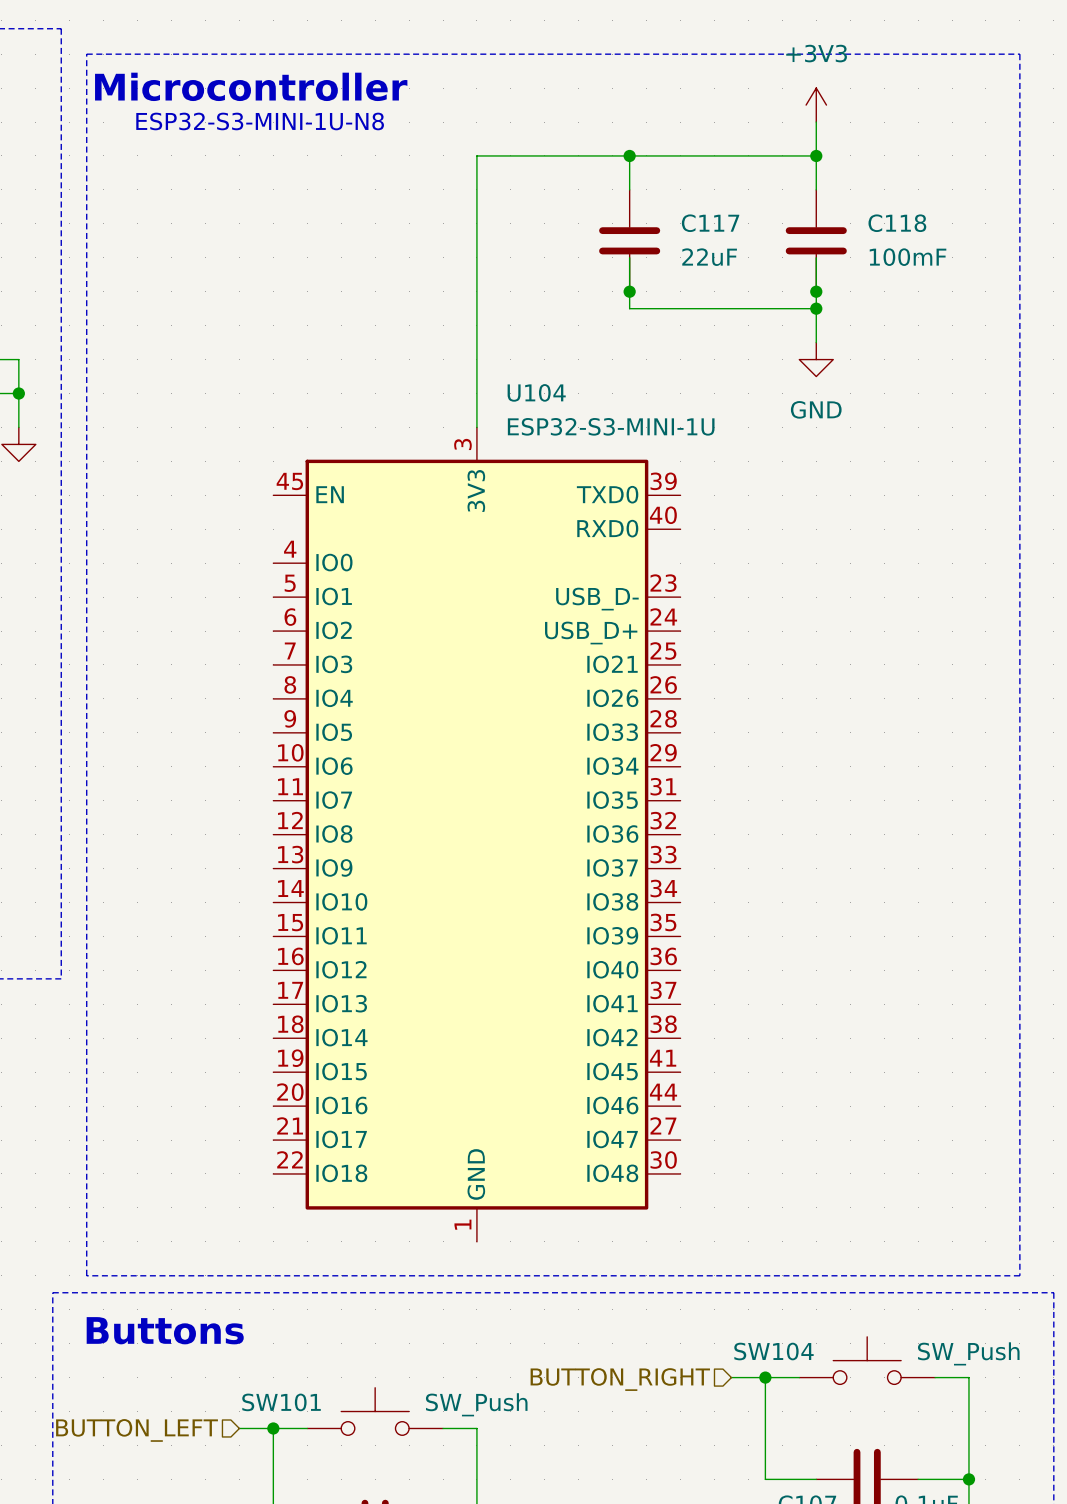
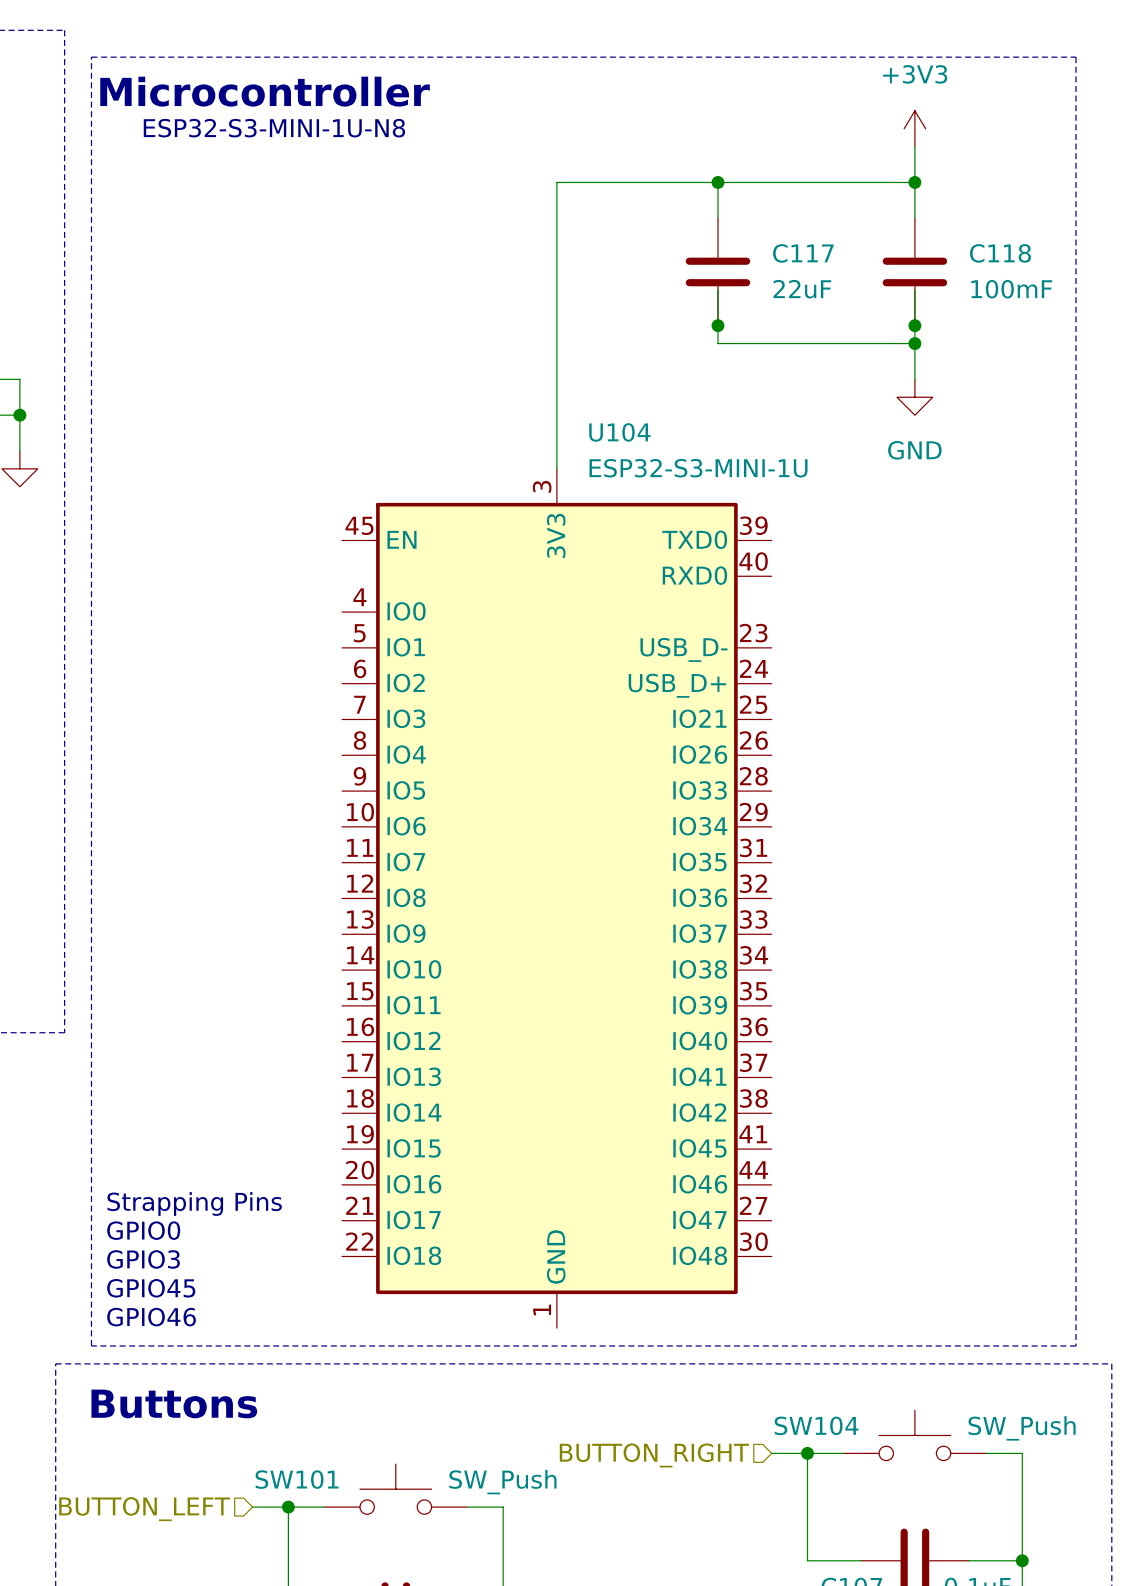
power symbol position: +3V3 (816, 105) -> +3V3 (914, 128)
wire: (816, 122) (816, 189) -> (914, 146) (914, 218)
wire: (629, 155) (629, 189) -> (717, 182) (717, 218)
junction position: (629, 155) -> (717, 182)
wire: (816, 155) (476, 155) (476, 427) -> (914, 182) (556, 182) (556, 468)
junction position: (816, 155) -> (914, 182)
C117 position: (629, 240) -> (717, 271)
C118 position: (816, 240) -> (914, 271)
wire: (629, 257) (629, 308) (816, 308) -> (717, 289) (717, 343) (914, 343)
wire: (816, 257) (816, 342) -> (914, 289) (914, 379)
junction position: (629, 291) -> (717, 325)
junction: (816, 291) -> none
junction: (816, 308) -> none
junction: none -> (914, 325)
junction: none -> (914, 343)
power symbol position: GND (816, 359) -> GND (914, 397)
U104 position: (476, 834) -> (556, 898)
text: none -> Strapping Pins (194, 1203)
text: none -> GPIO0 (143, 1230)
text: none -> GPIO3 (143, 1259)
text: none -> GPIO45 (151, 1288)
text: none -> GPIO46 (151, 1317)

